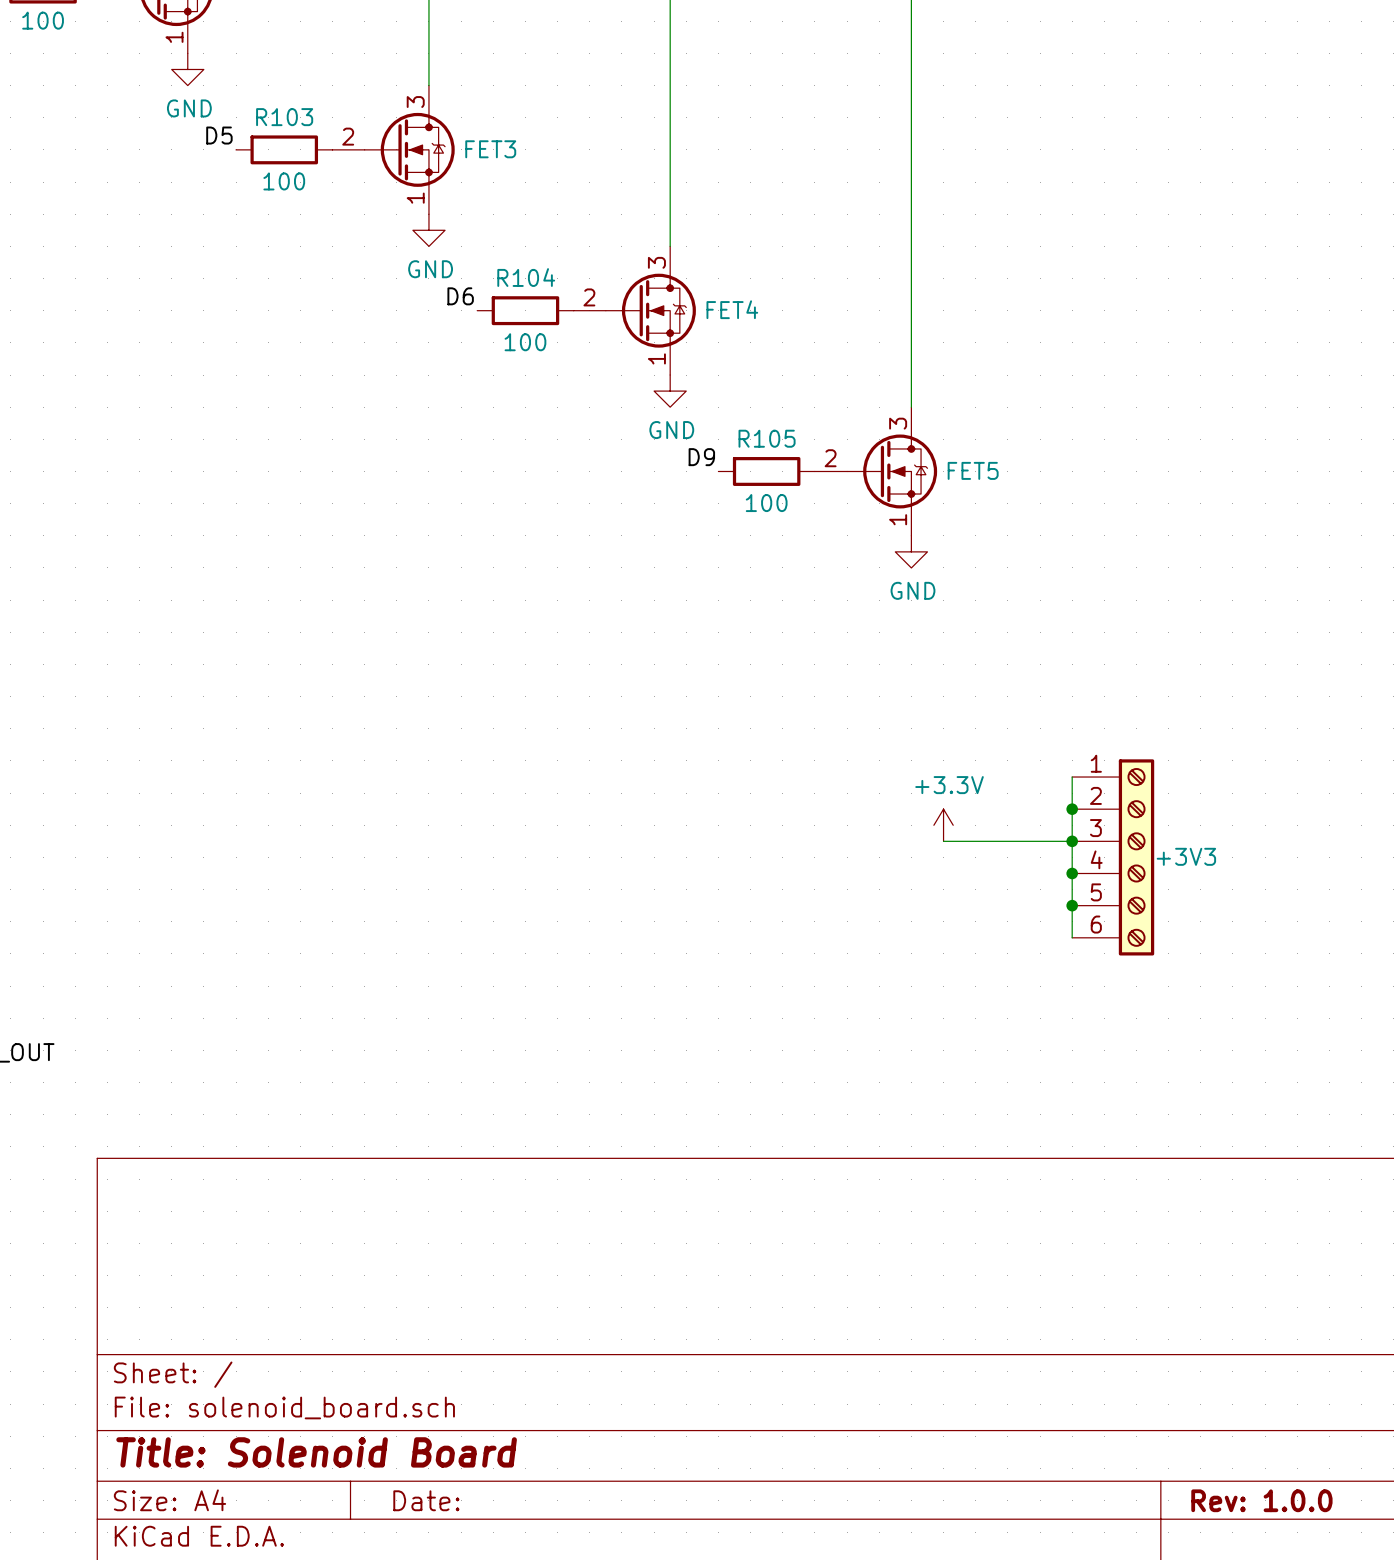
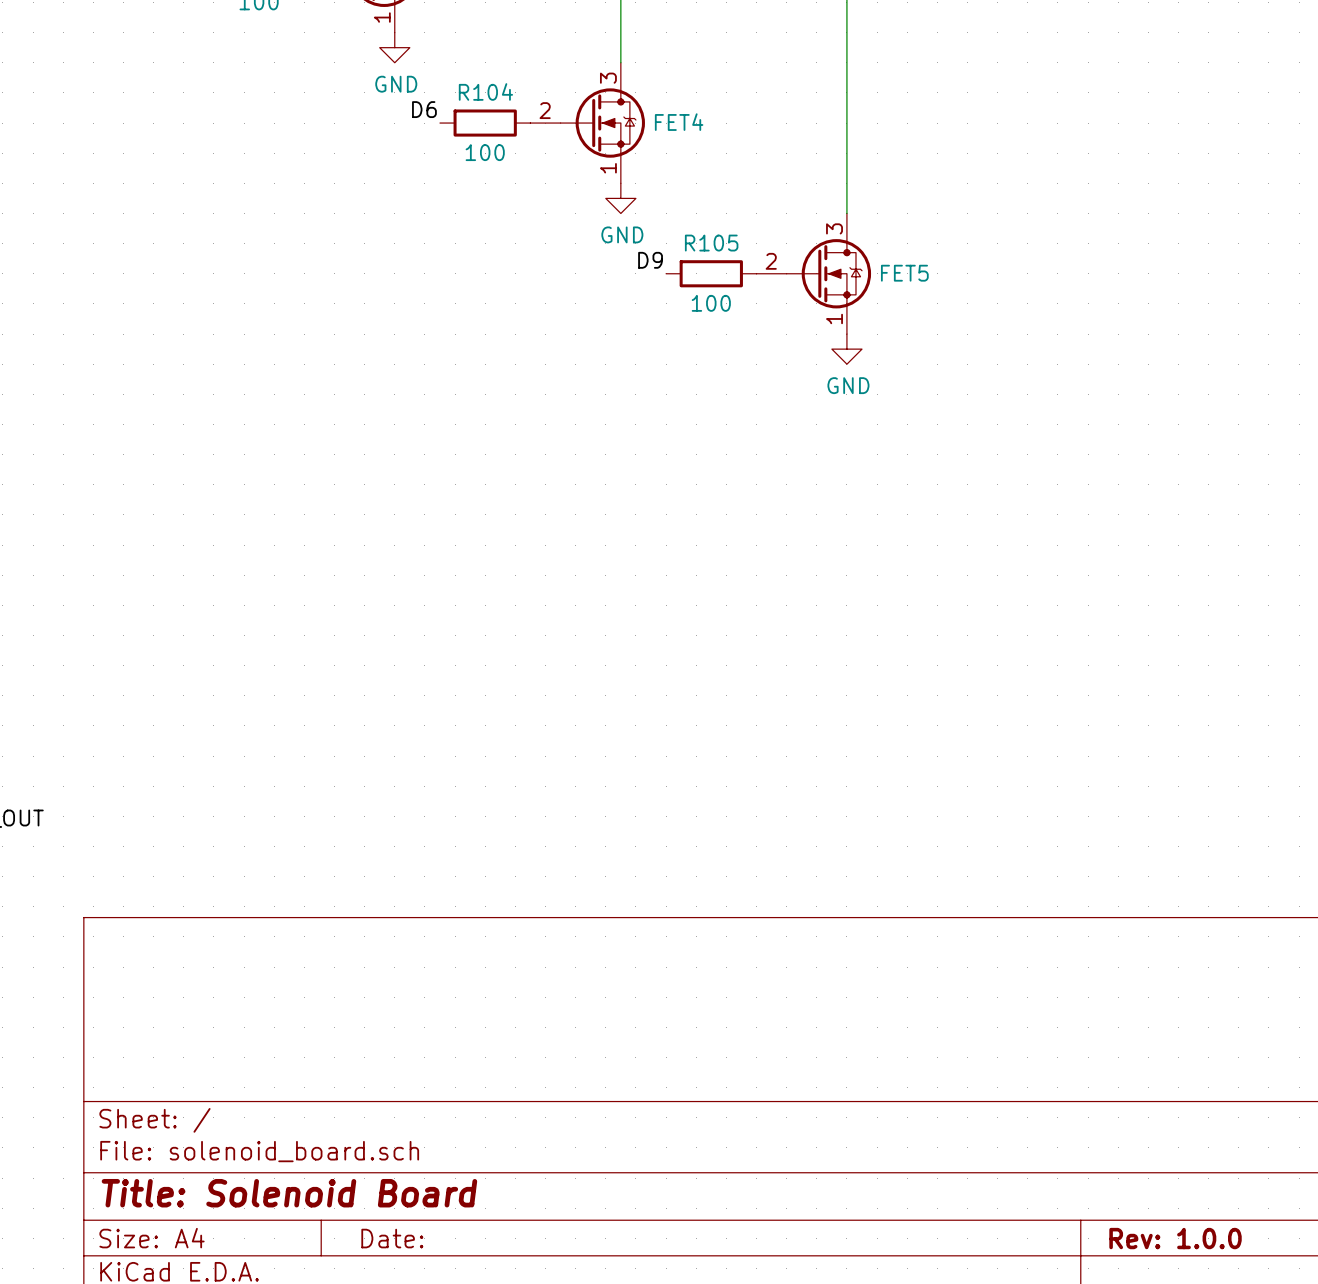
wire: (1072, 777) (1072, 937) -> none
junction: (1072, 809) -> none
power symbol: +3.3V (943, 825) -> none
wire: (943, 841) (1072, 841) -> none
junction: (1072, 841) -> none
+3V3: (1113, 857) -> none
junction: (1072, 873) -> none
junction: (1072, 905) -> none

